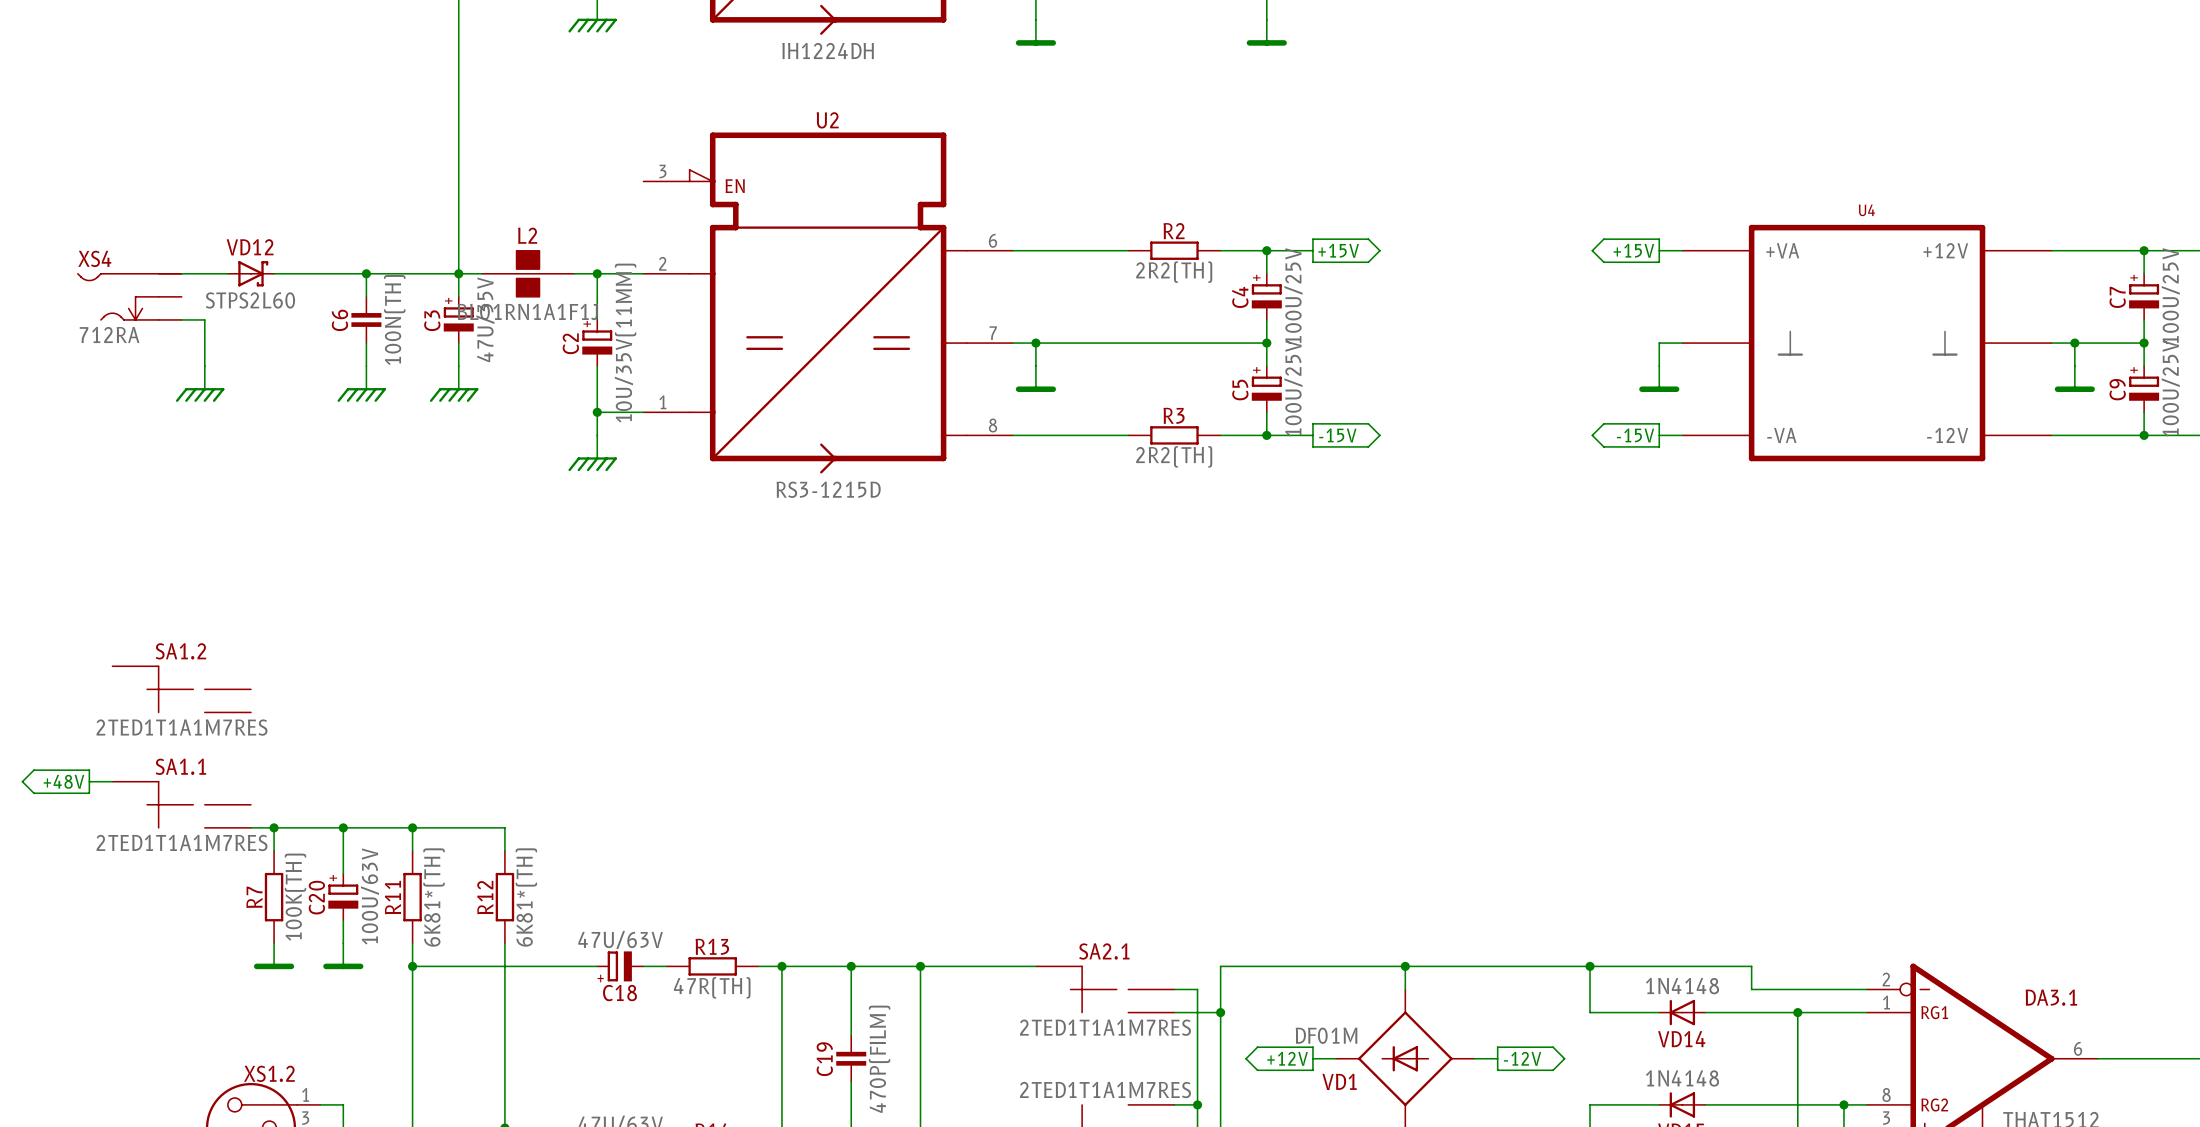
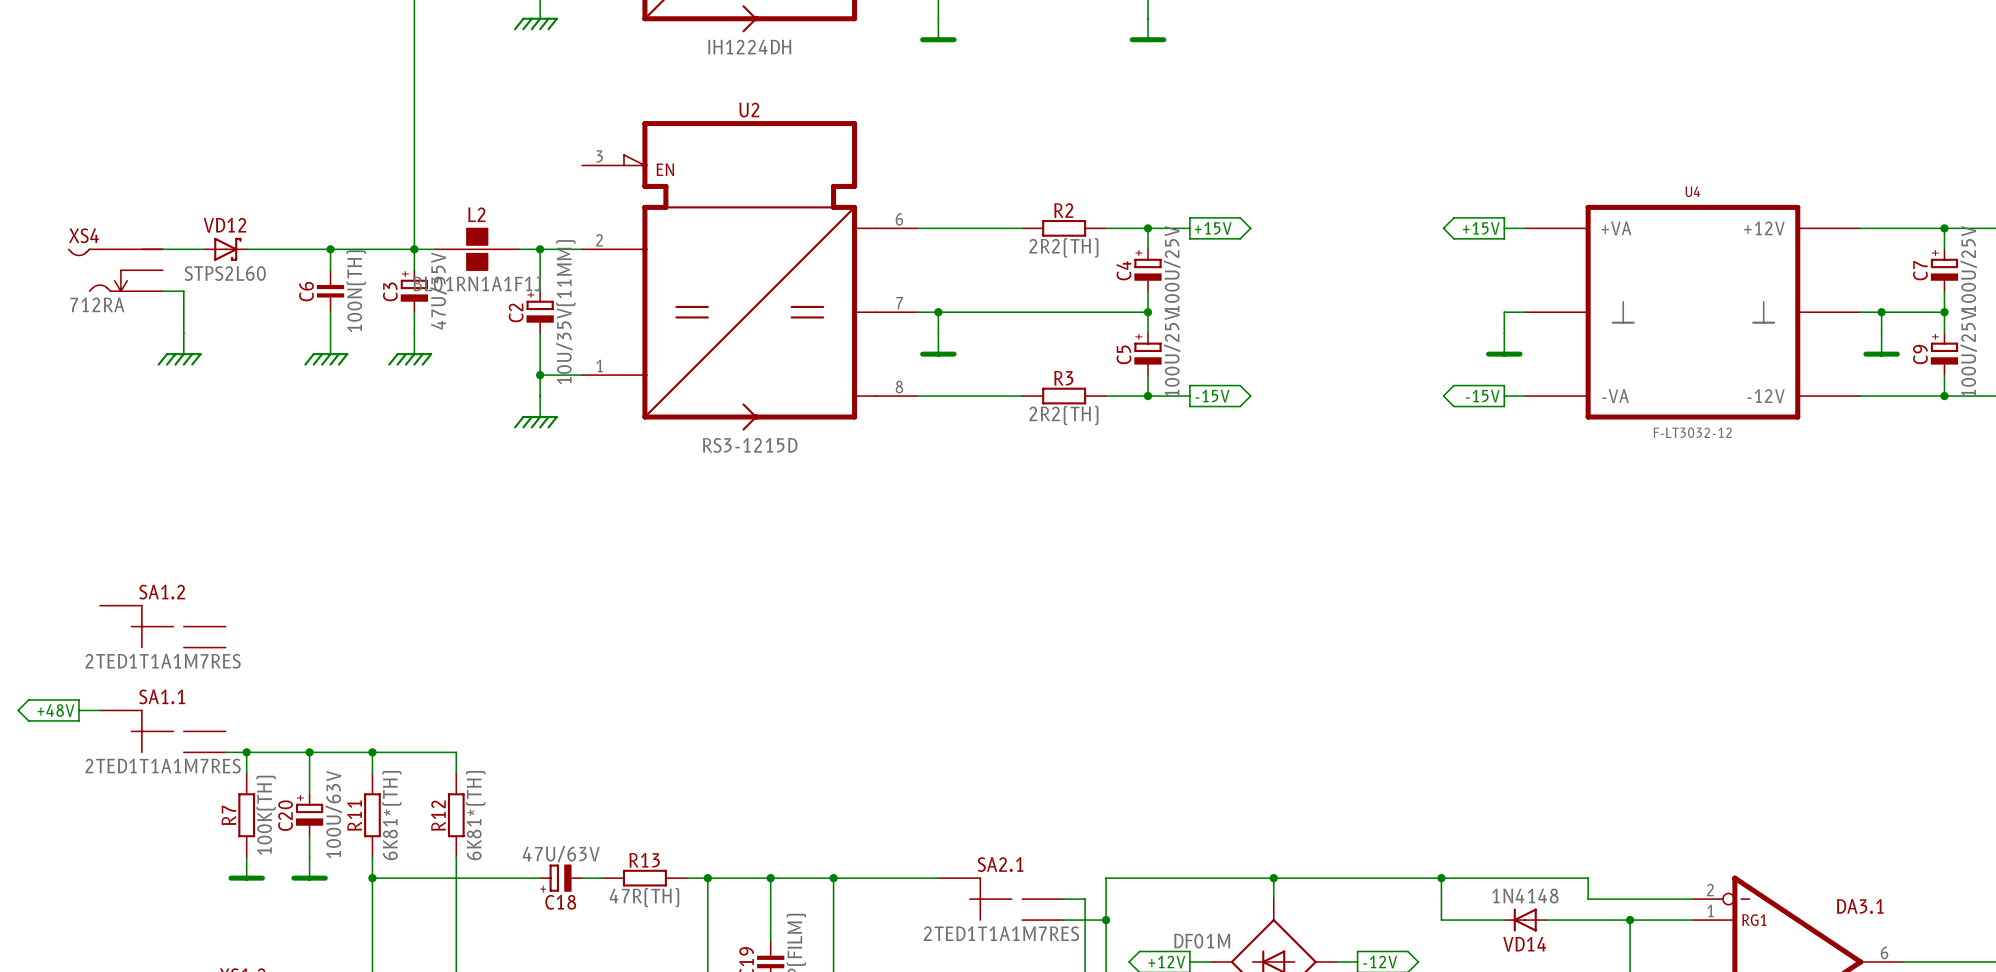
U4 value: none -> F-LT3032-12 (1692, 432)

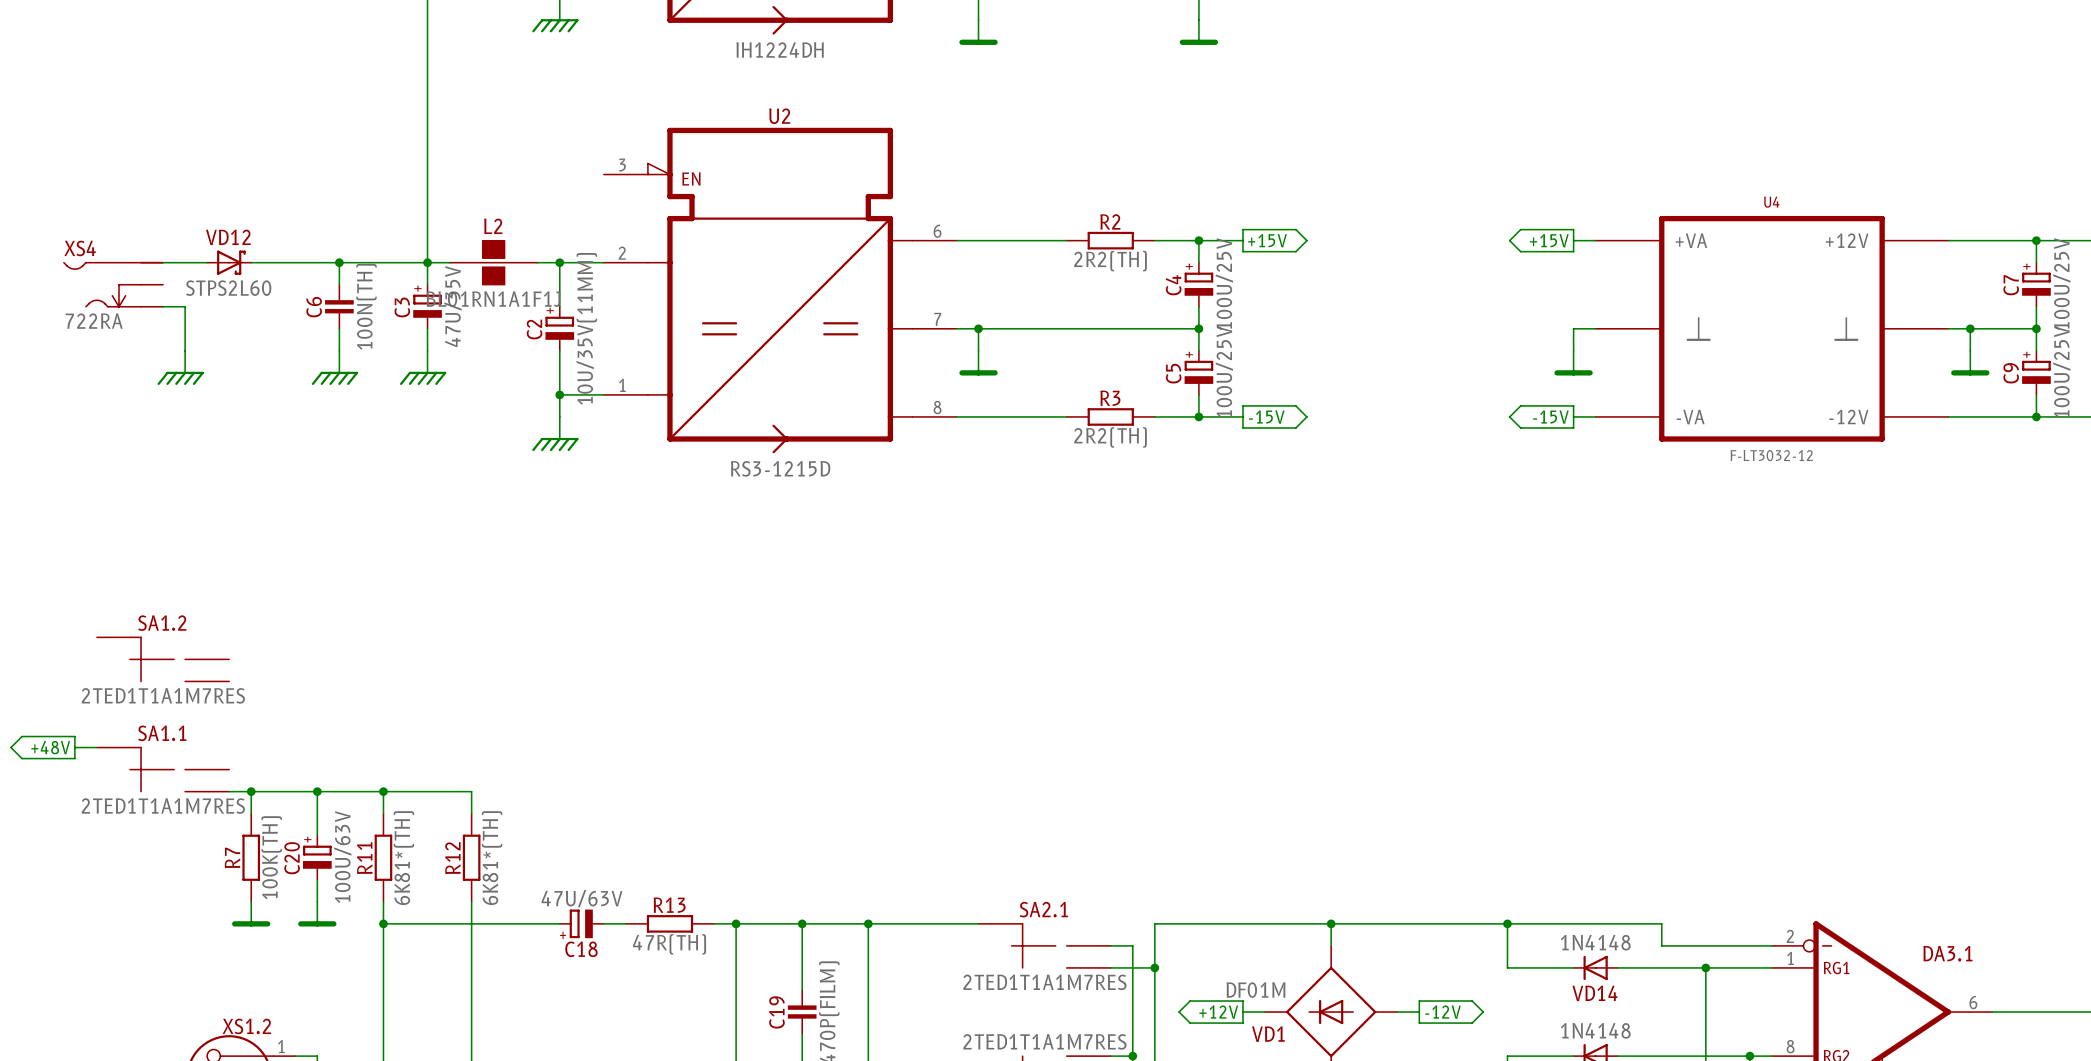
XS4 value: 712RA (97, 304) -> 722RA (94, 321)

